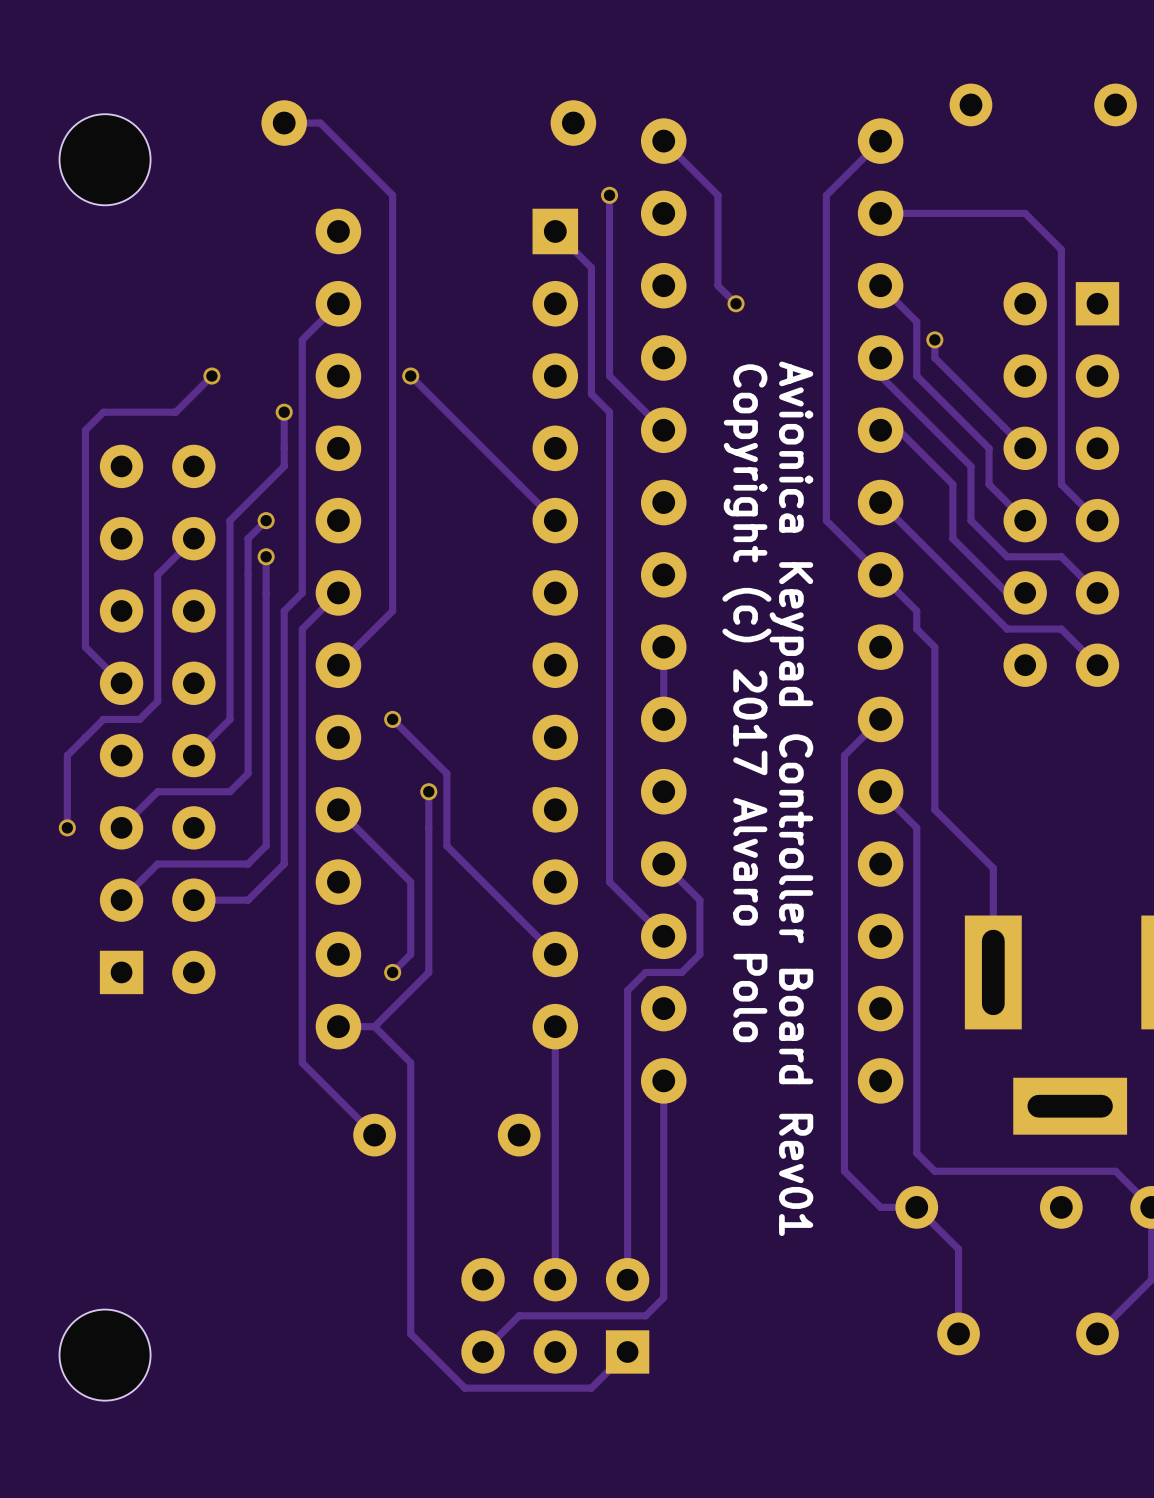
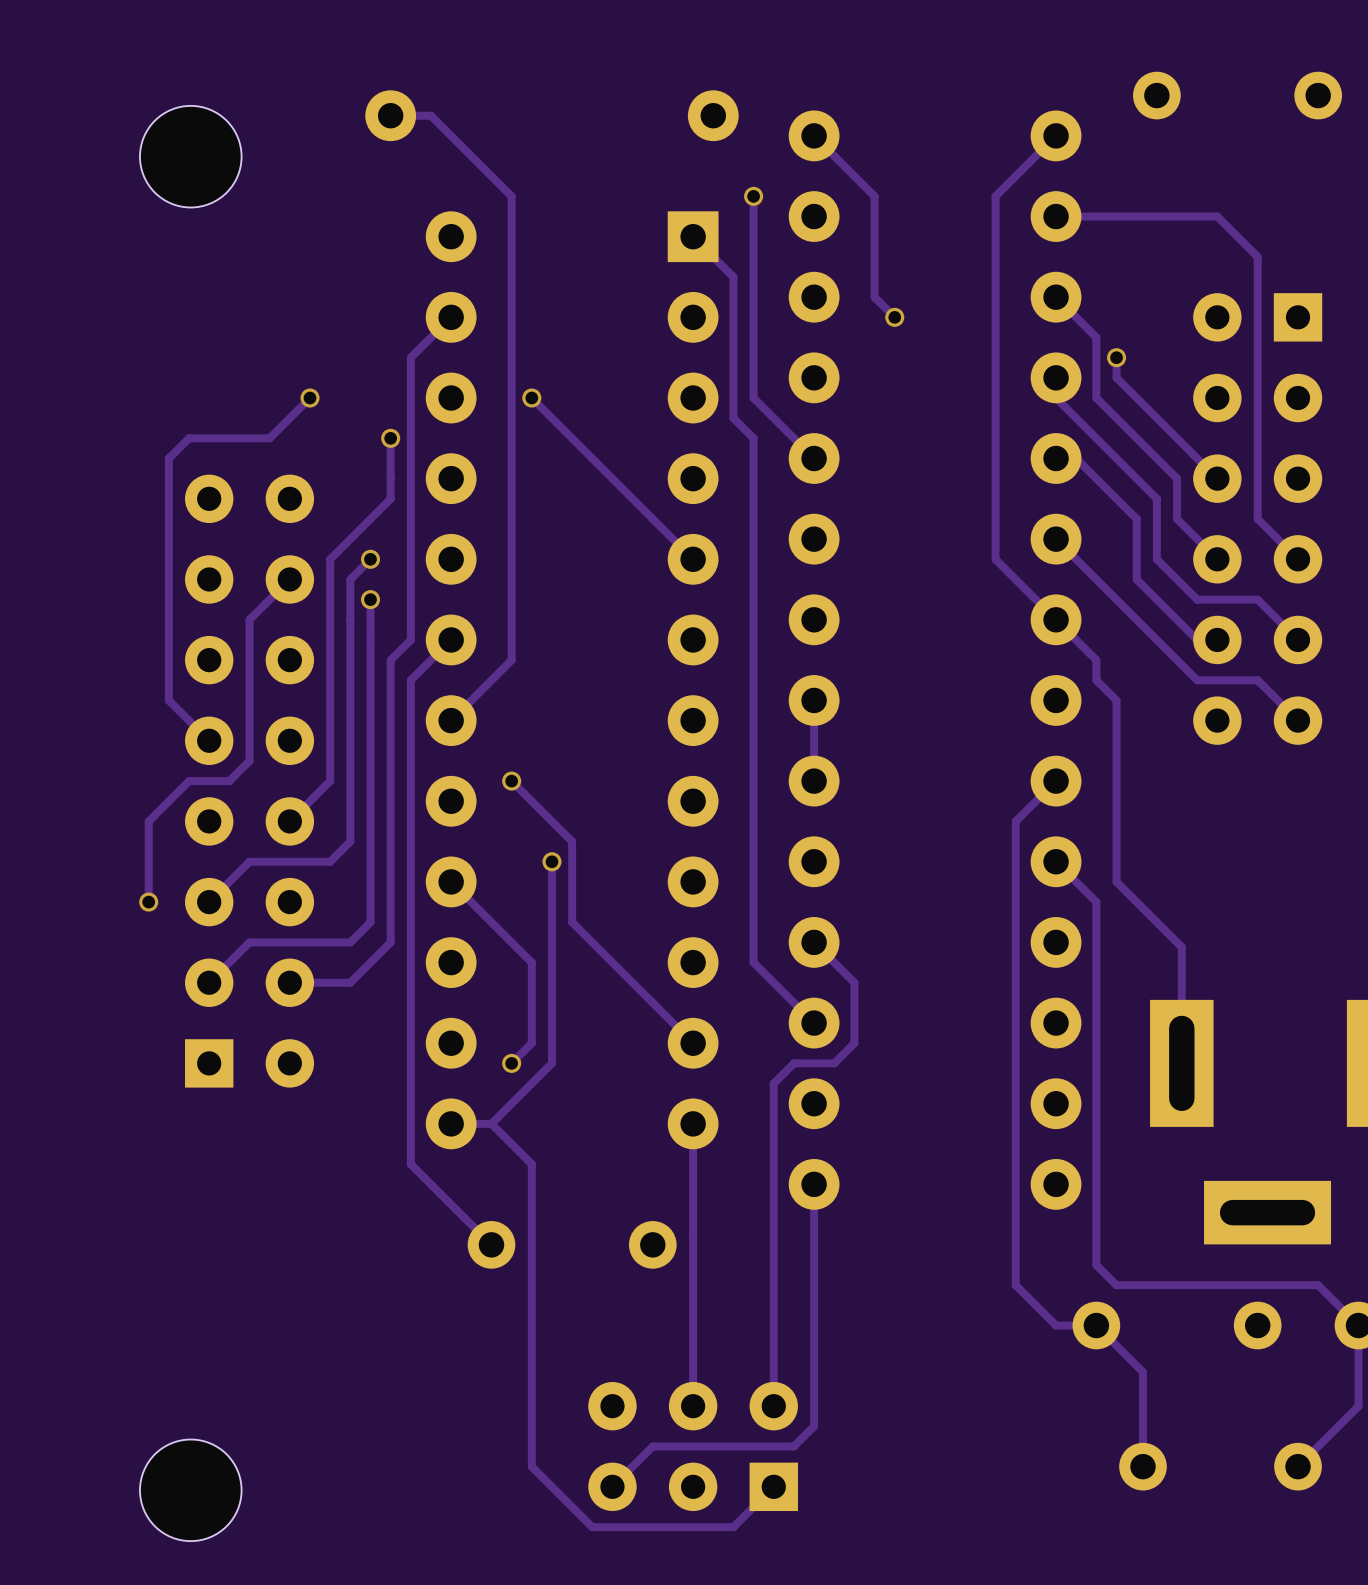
text: Copyright (c) 2017 Alvaro Polo (746, 703) -> none
text: Avionica Keypad Controller Board Rev01 (791, 798) -> none

